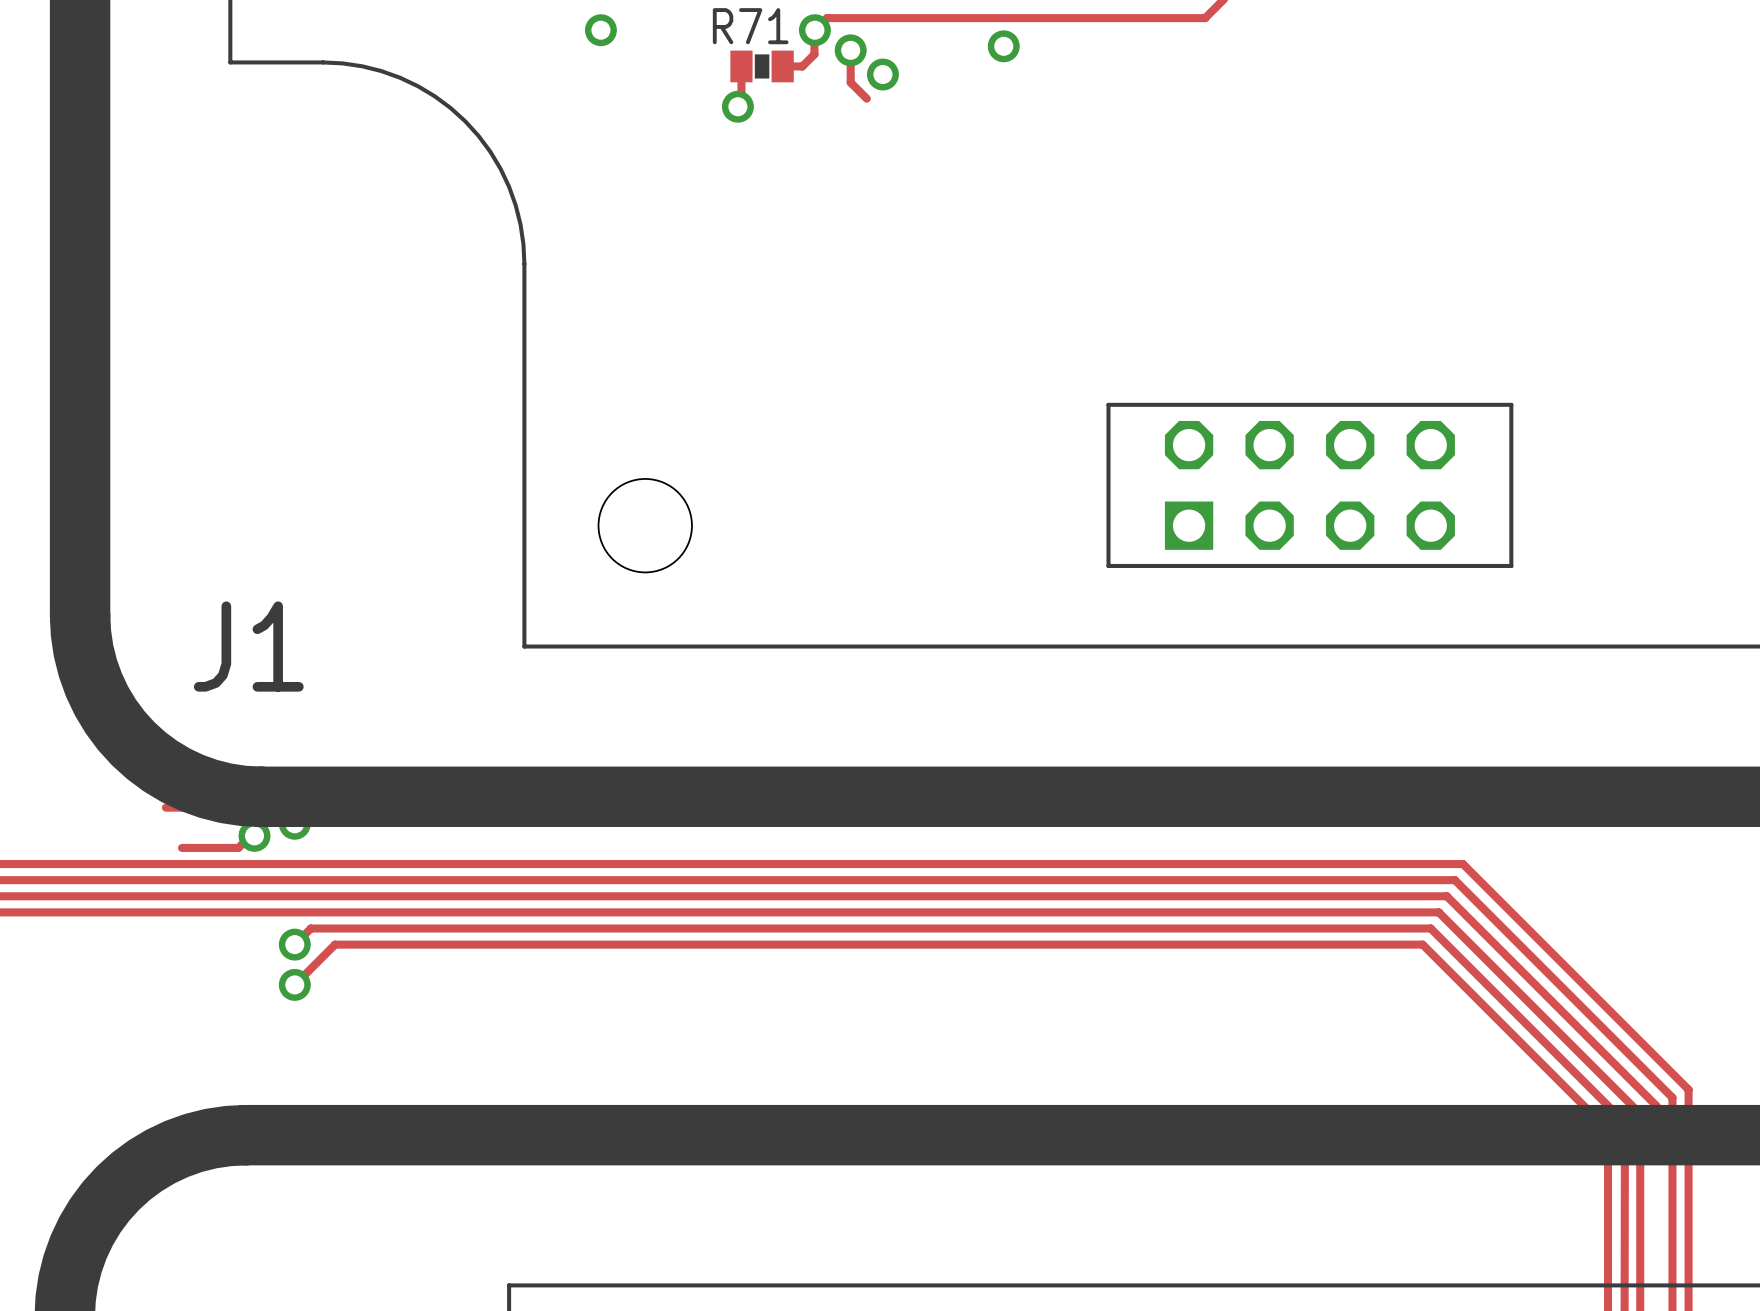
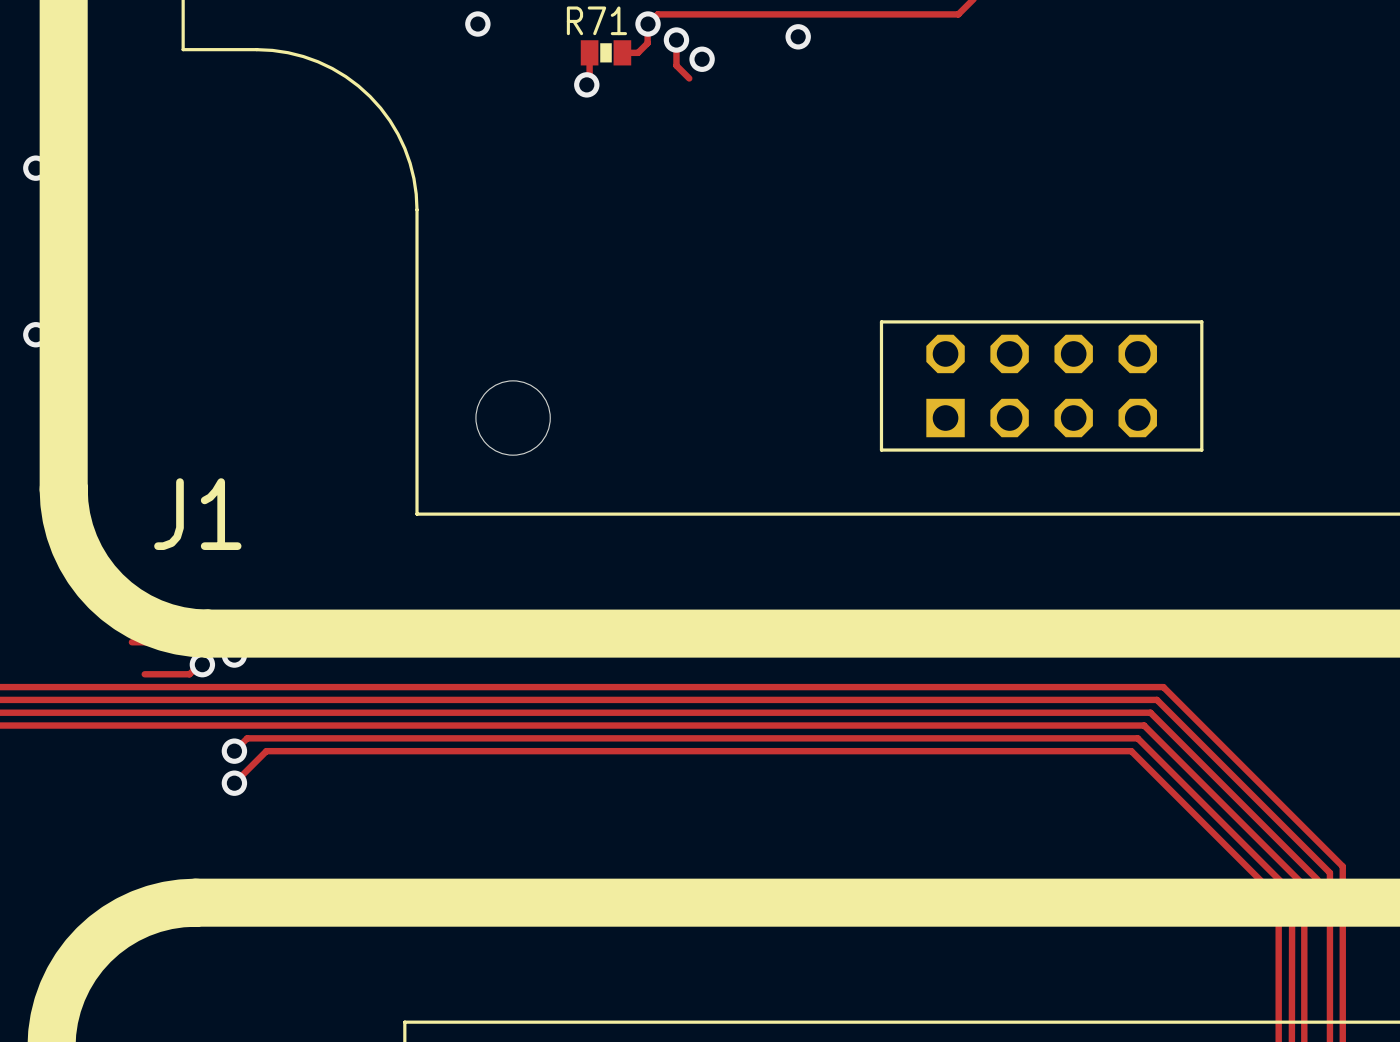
via: none -> (35, 168)
via: none -> (35, 334)

